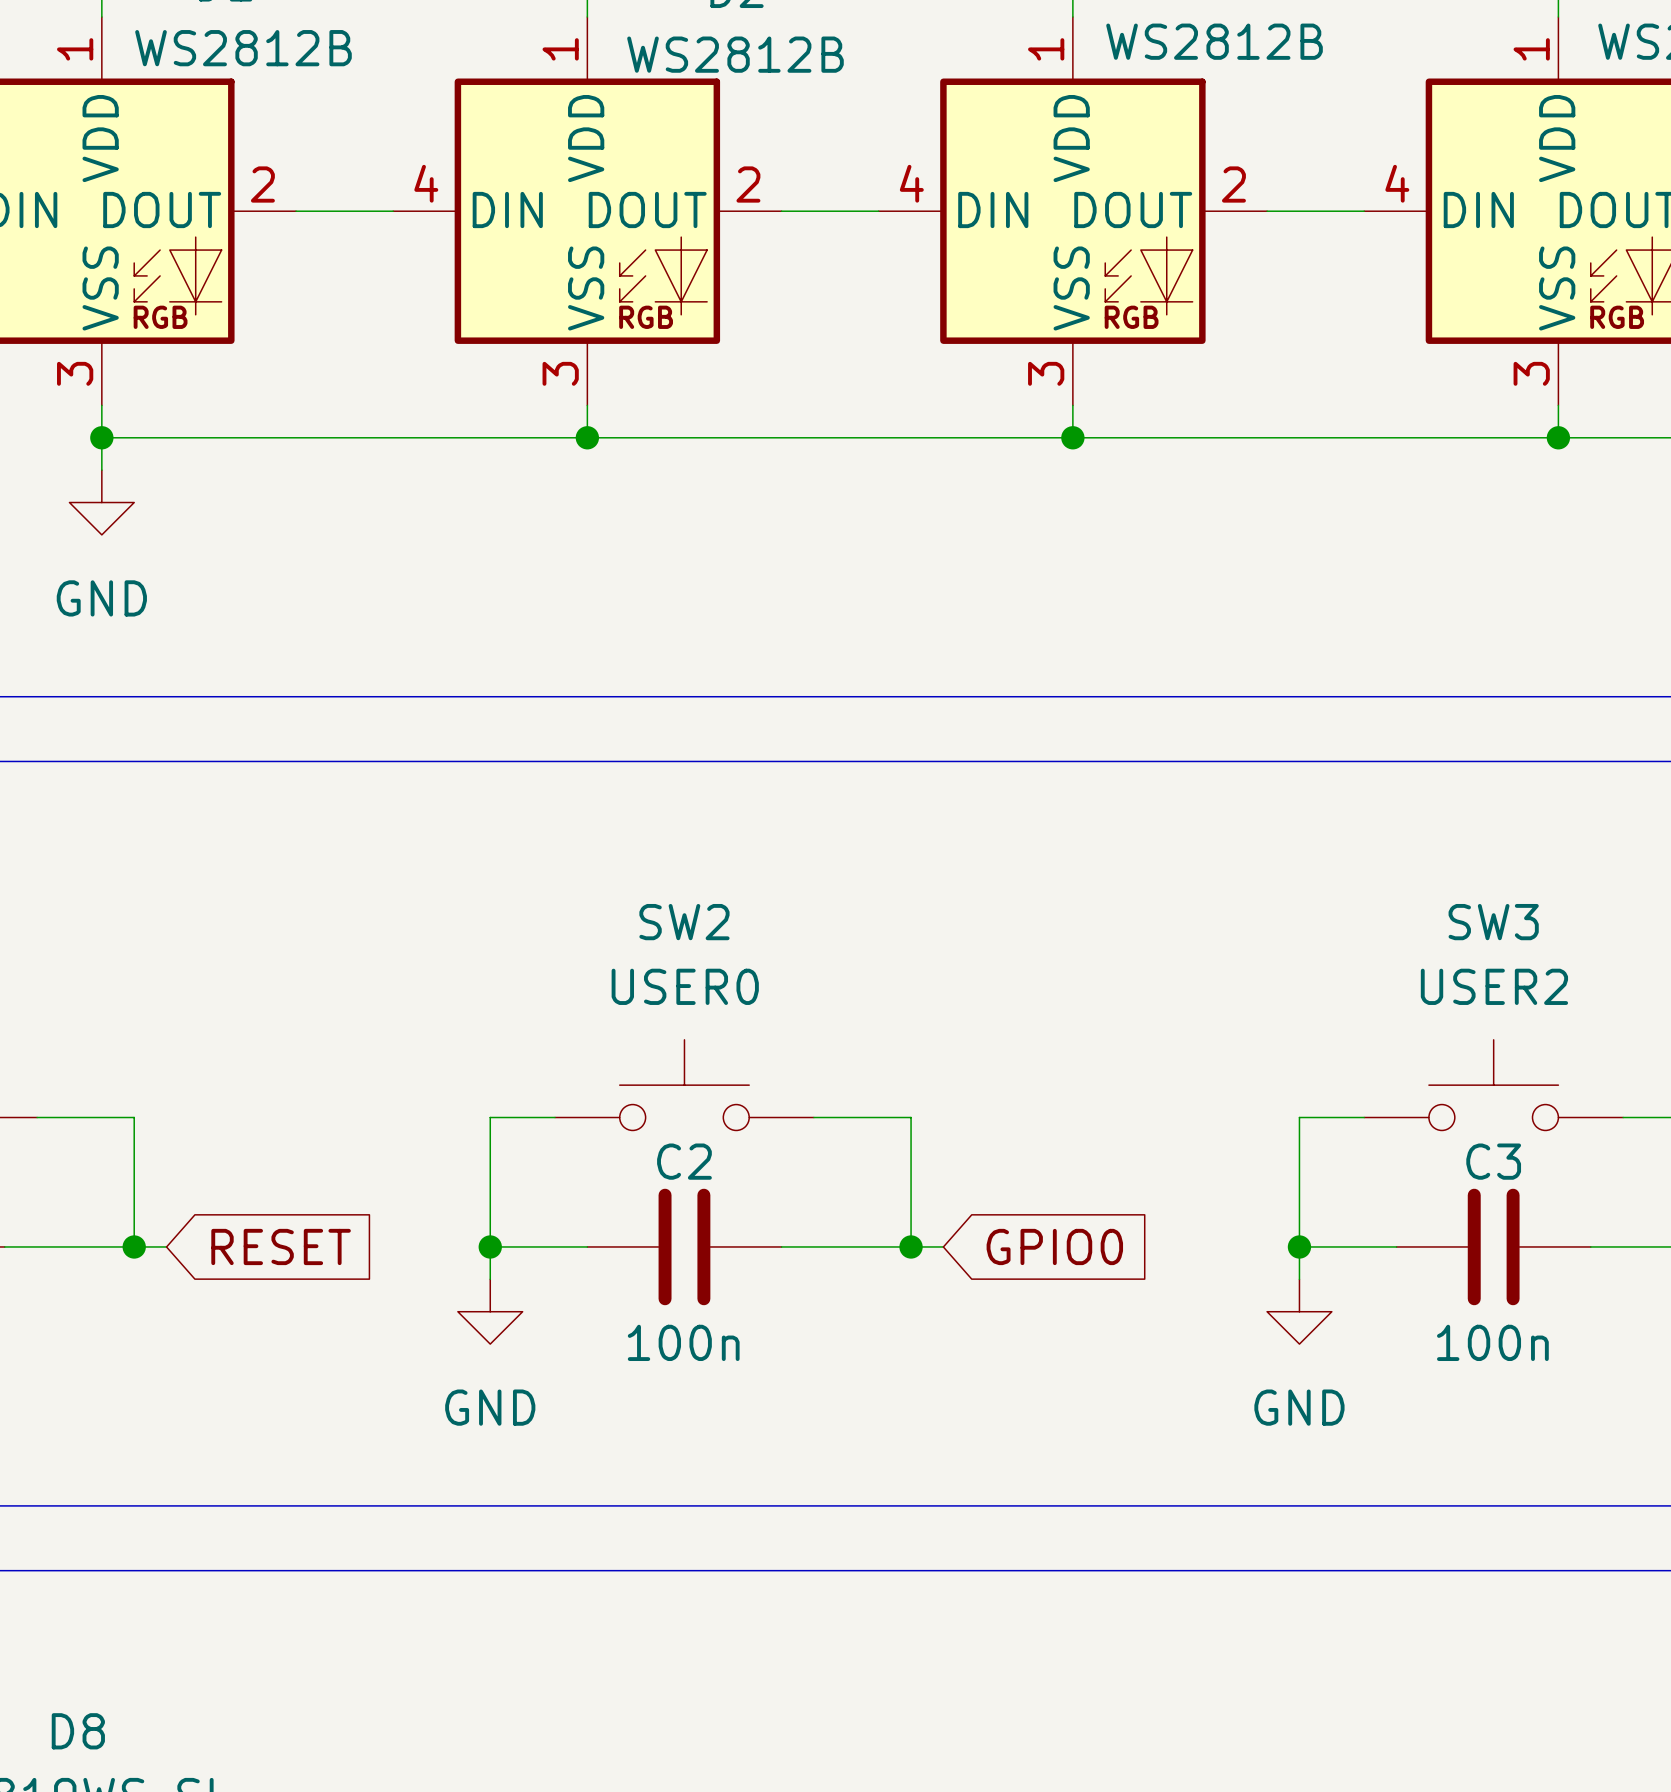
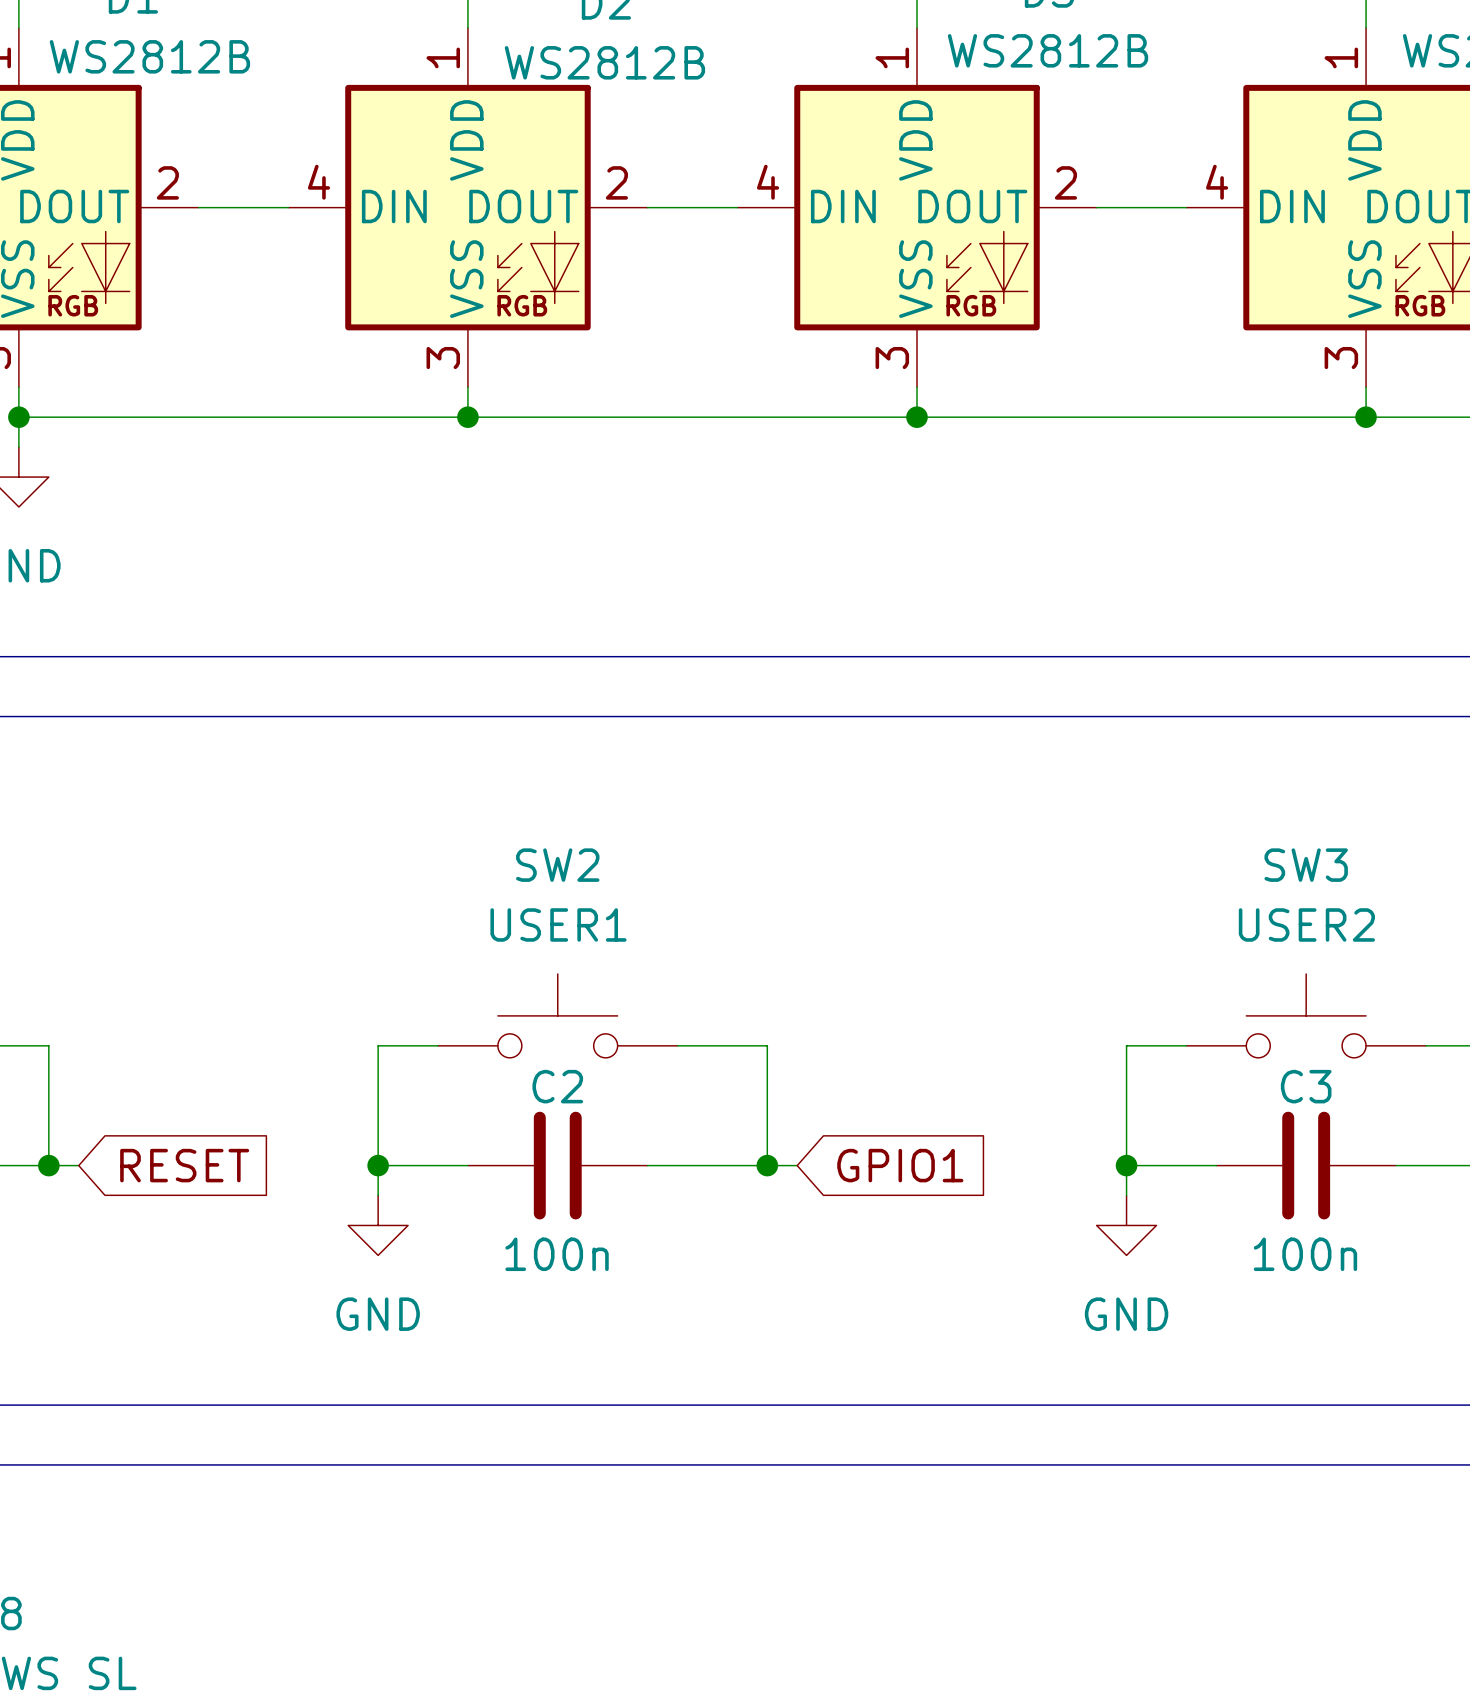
SW2 value: USER0 (685, 986) -> USER1 (558, 924)
global label: GPIO0 (1054, 1246) -> GPIO1 (900, 1165)

